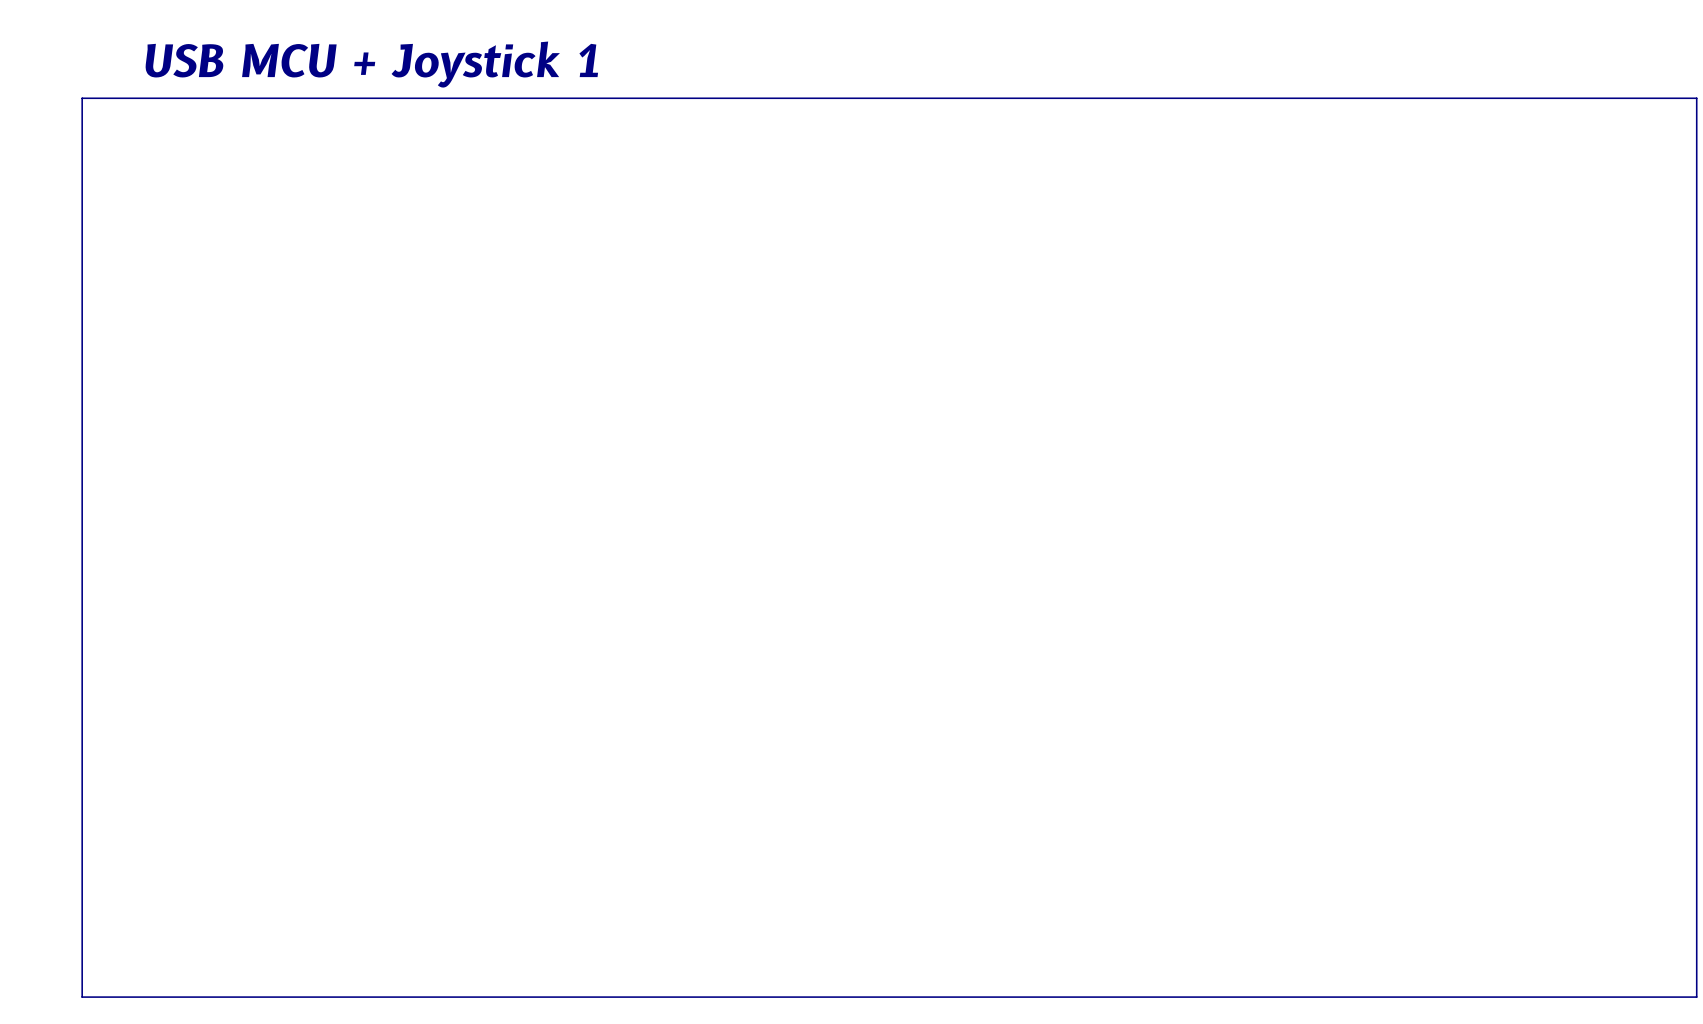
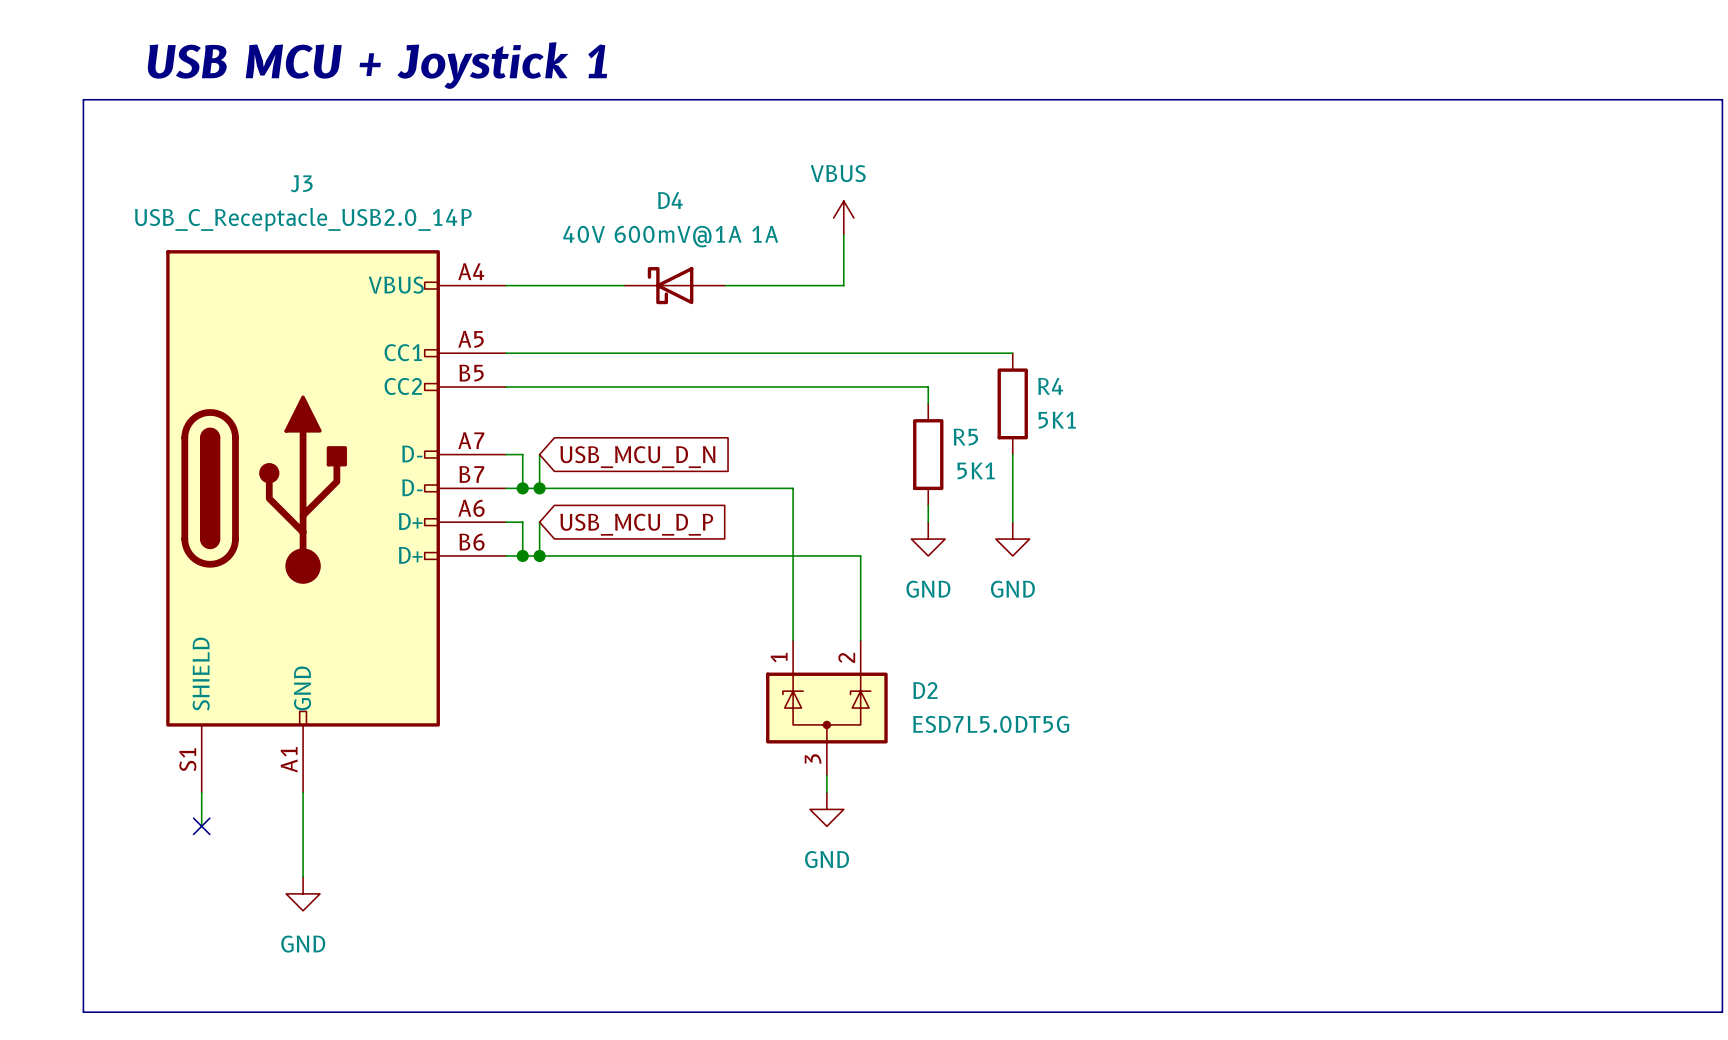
power symbol: none -> VBUS (843, 218)
wire: none -> (843, 234) (843, 285) (725, 285)
wire: none -> (505, 285) (624, 285)
D4: none -> 40V 600mV@1A 1A (674, 285)
wire: none -> (505, 353) (1012, 353)
wire: none -> (505, 387) (928, 387) (928, 403)
R4: none -> 5K1 (1012, 403)
wire: none -> (505, 454) (522, 454) (522, 488)
wire: none -> (539, 454) (539, 488)
R5: none -> 5K1 (928, 454)
wire: none -> (1012, 454) (1012, 522)
global label: none -> USB_MCU_D_N (637, 457)
wire: none -> (505, 488) (793, 488) (793, 640)
junction: none -> (522, 488)
junction: none -> (539, 488)
wire: none -> (928, 505) (928, 522)
J3: none -> USB_C_Receptacle_USB2.0_14P (336, 521)
wire: none -> (505, 522) (522, 522) (522, 555)
wire: none -> (539, 522) (539, 555)
global label: none -> USB_MCU_D_P (636, 524)
power symbol: none -> GND (928, 539)
power symbol: none -> GND (1012, 539)
wire: none -> (505, 555) (860, 555) (860, 640)
junction: none -> (522, 555)
junction: none -> (539, 555)
D2: none -> ESD7L5.0DT5G (826, 708)
wire: none -> (826, 775) (826, 792)
wire: none -> (201, 792) (201, 826)
wire: none -> (303, 792) (303, 877)
power symbol: none -> GND (826, 809)
no-connect mark: none -> (201, 826)
power symbol: none -> GND (303, 893)

